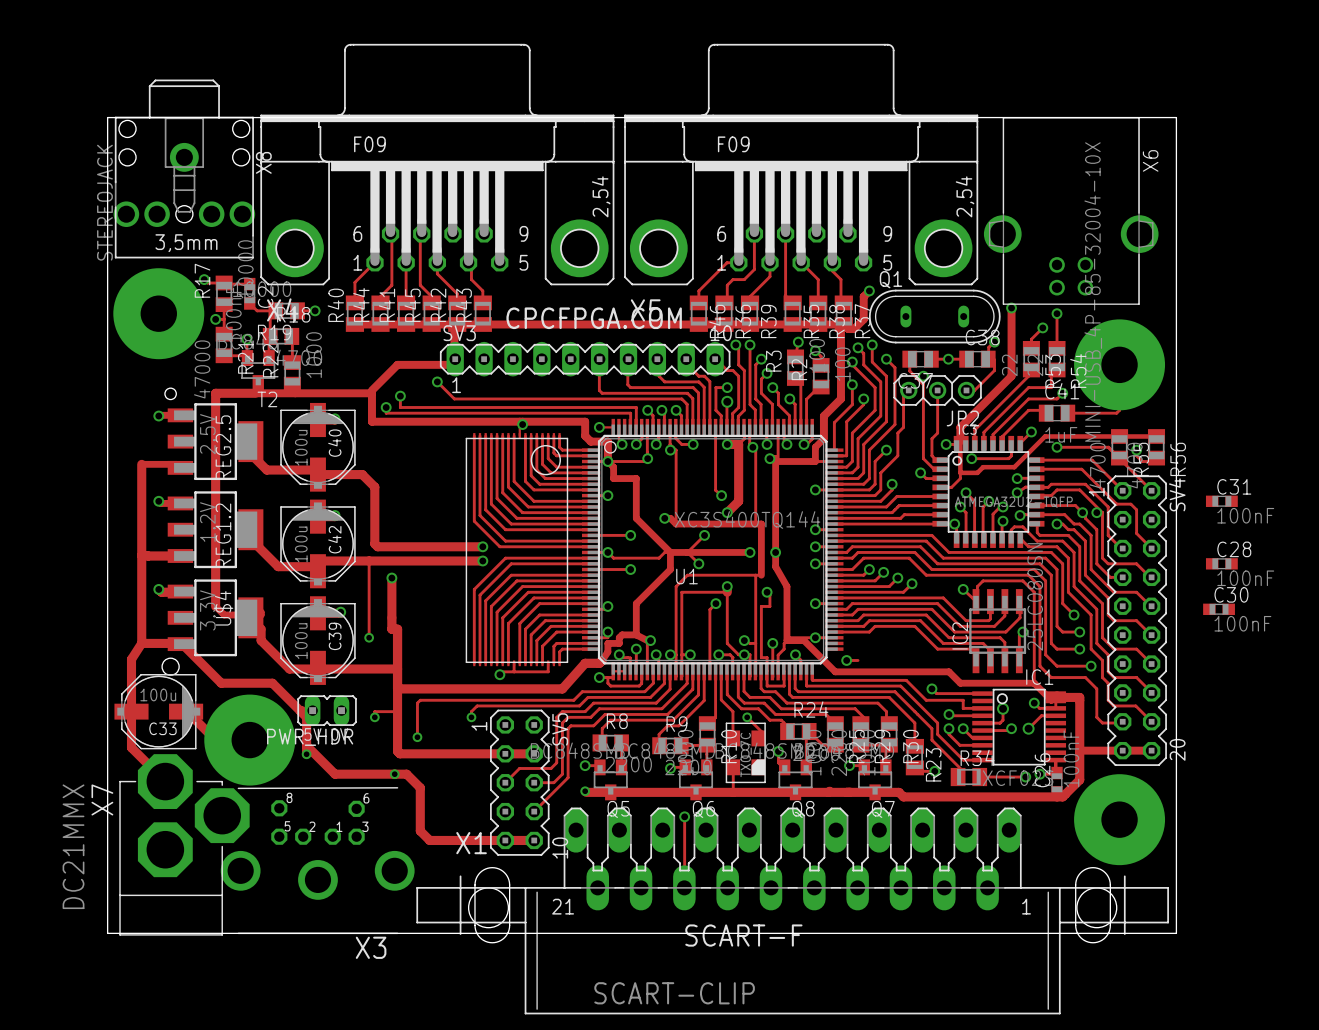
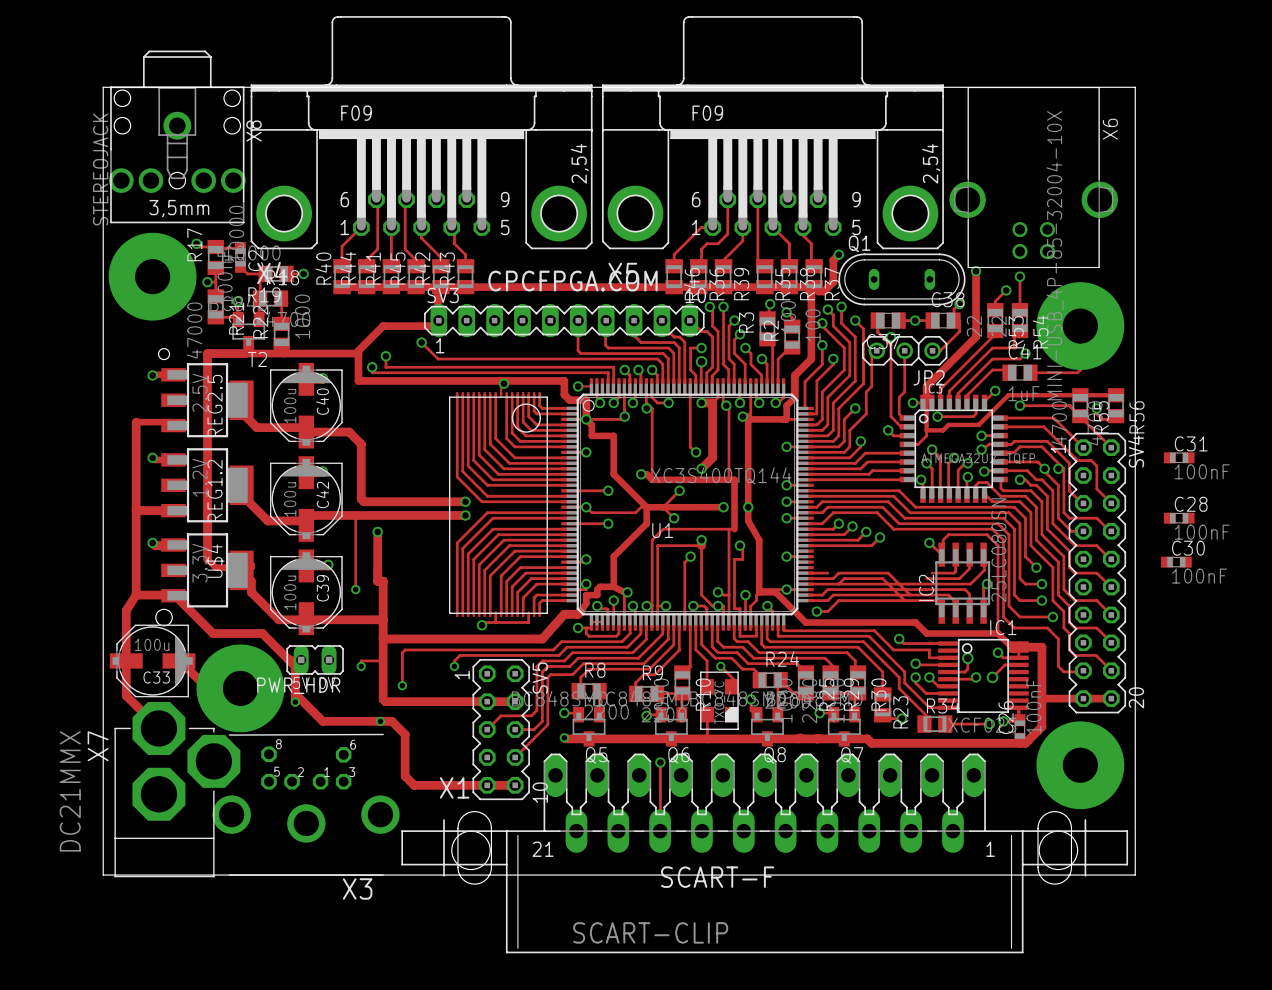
track: (834, 597) (943, 597) (966, 620) -> none
track: (834, 609) (846, 609) (852, 603) (937, 603) (960, 626) -> none
track: (834, 615) (852, 615) (858, 609) (931, 609) (954, 632) -> (838, 584) (921, 584)
track: (858, 620) (863, 615) (926, 615) (949, 637) -> (805, 595) (822, 595) (827, 589) (915, 589)
track: none -> (910, 595) (833, 595) (827, 600) (805, 600)
track: none -> (904, 600) (838, 600) (827, 611)

